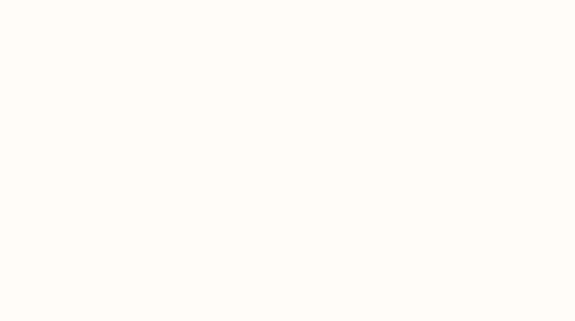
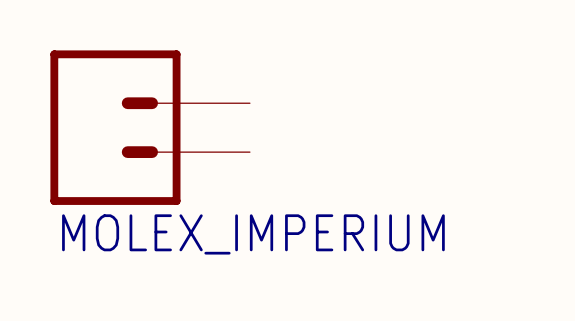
MOLEX_IMPERIUM: none -> (150, 127)

